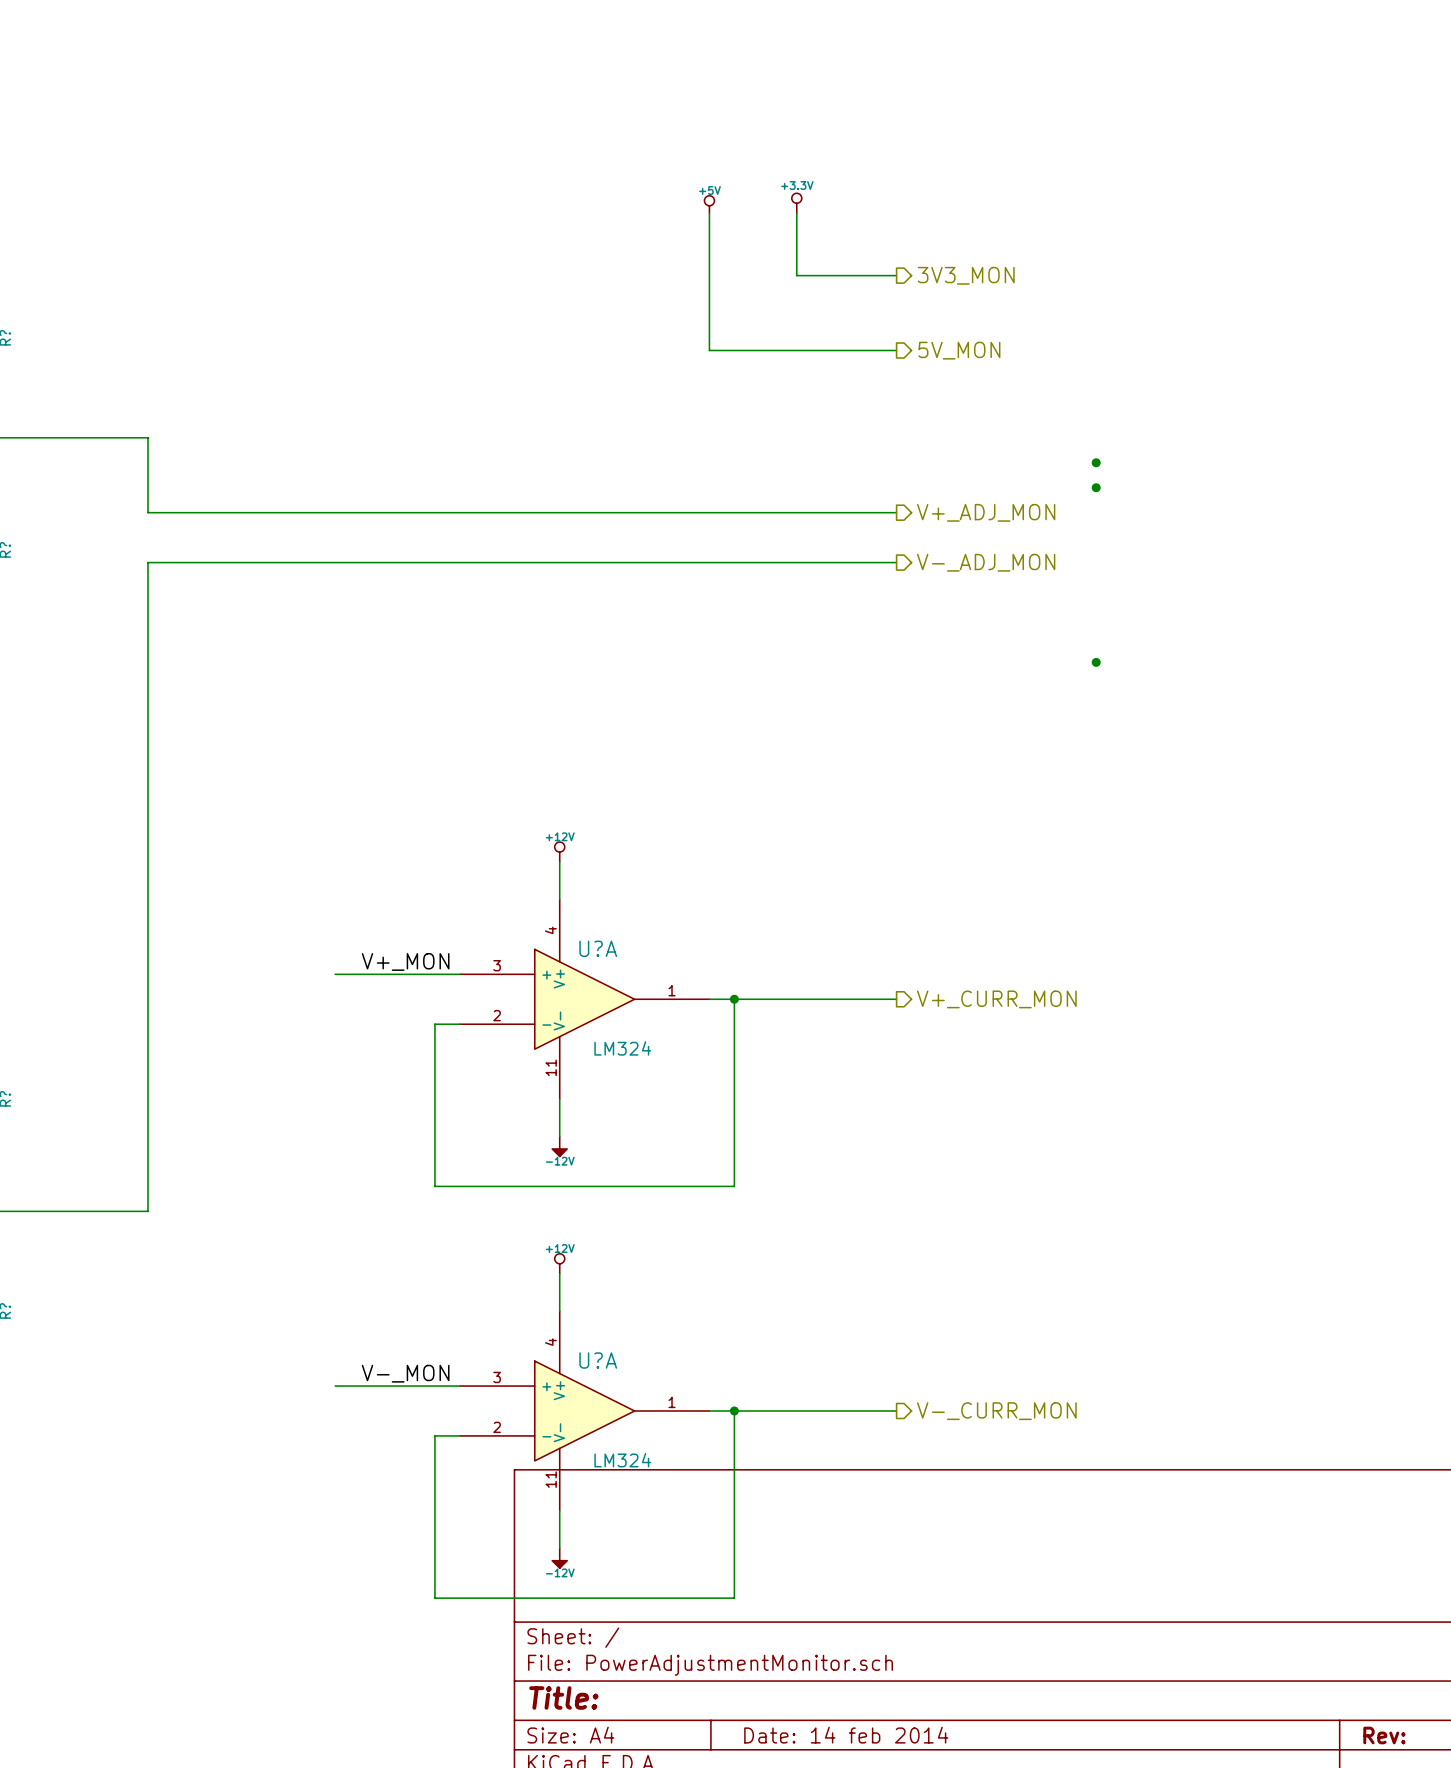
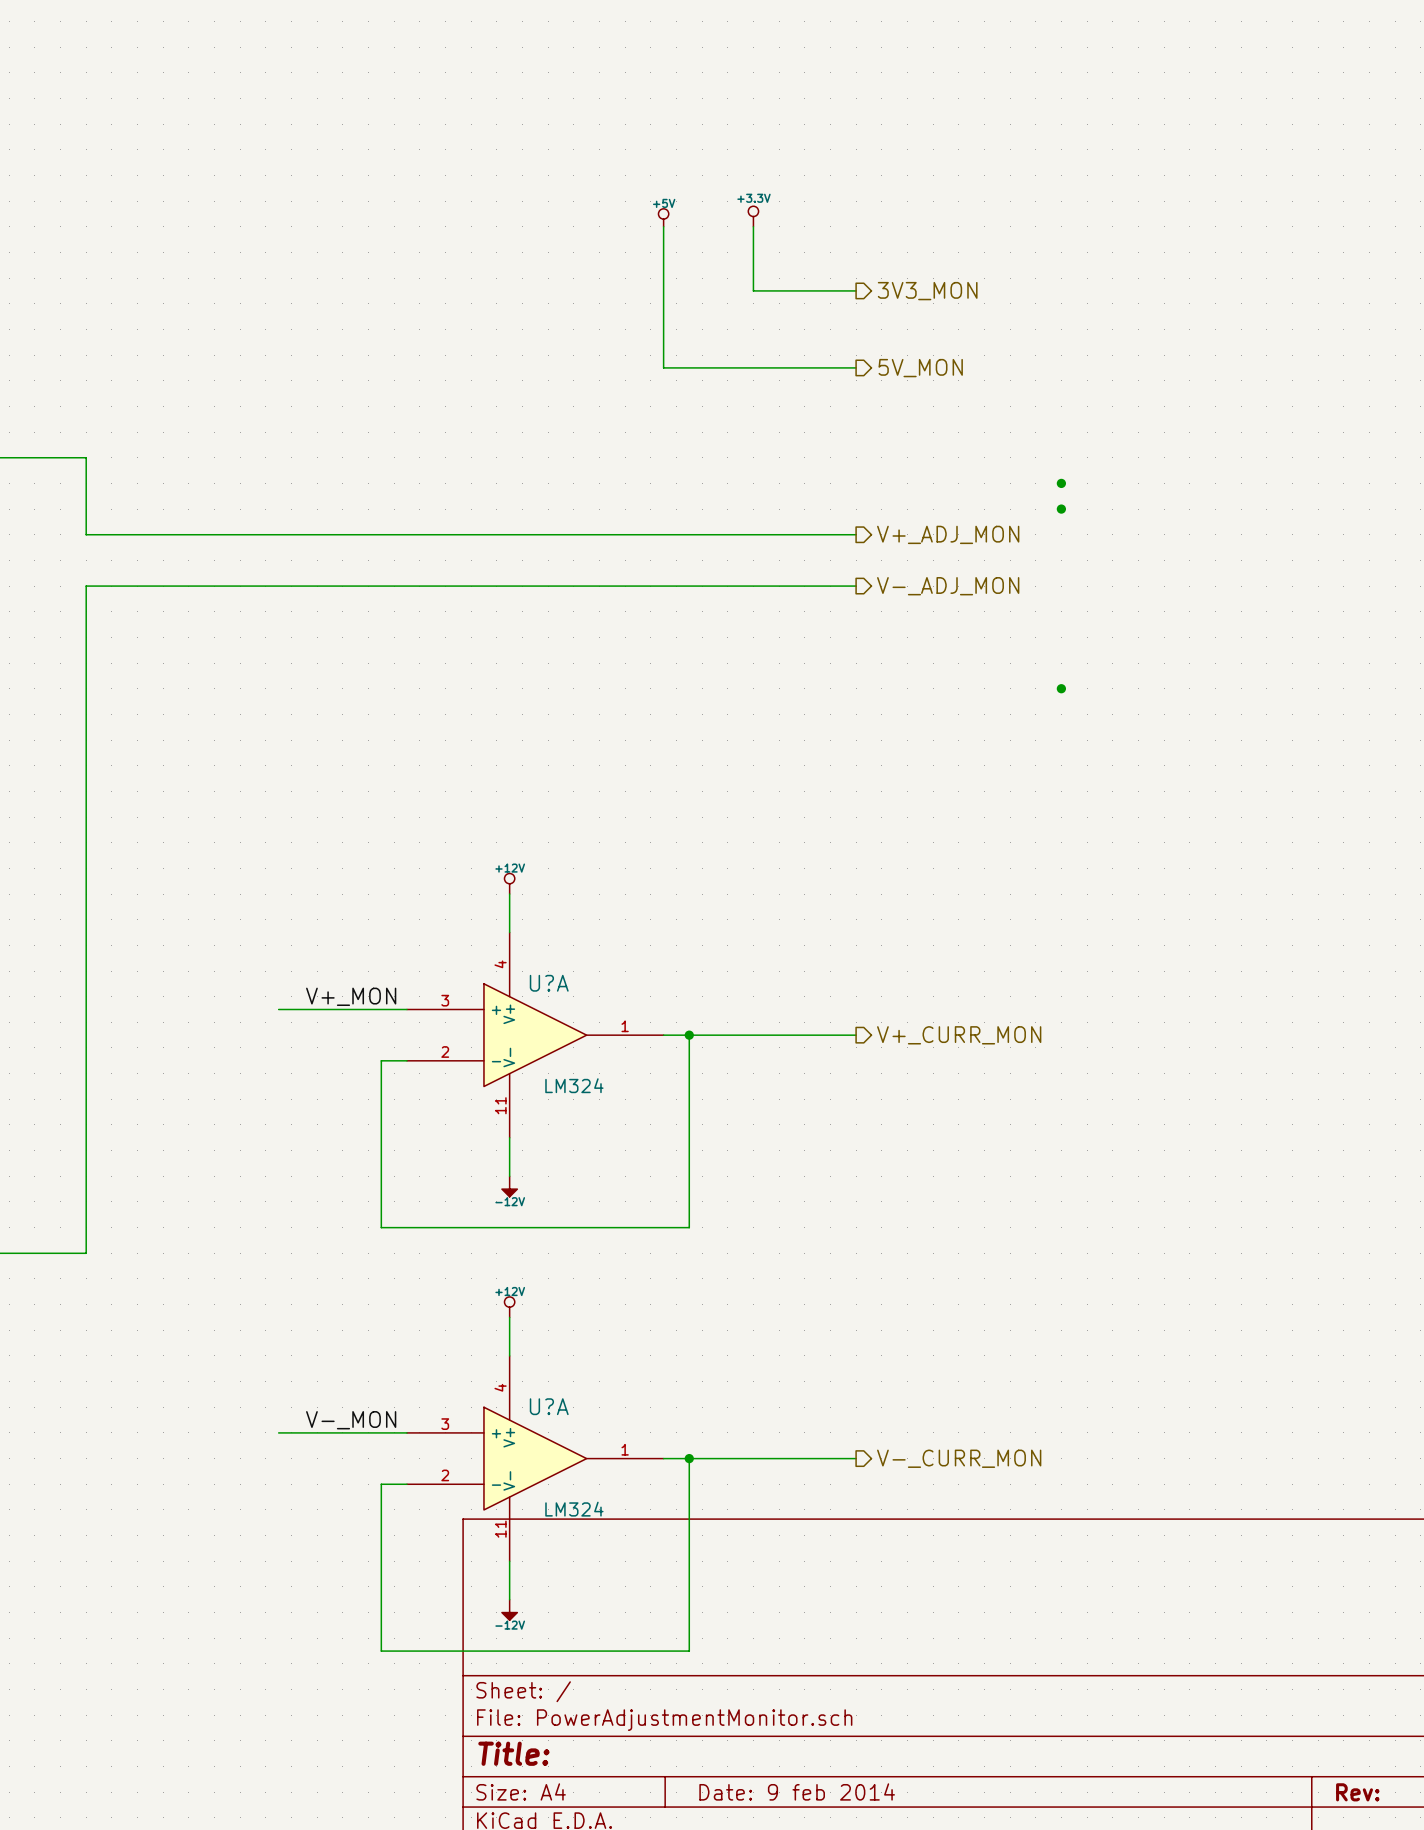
title block: Date: 14 feb 2014 (846, 1735) -> Date: 9 feb 2014 (797, 1791)

